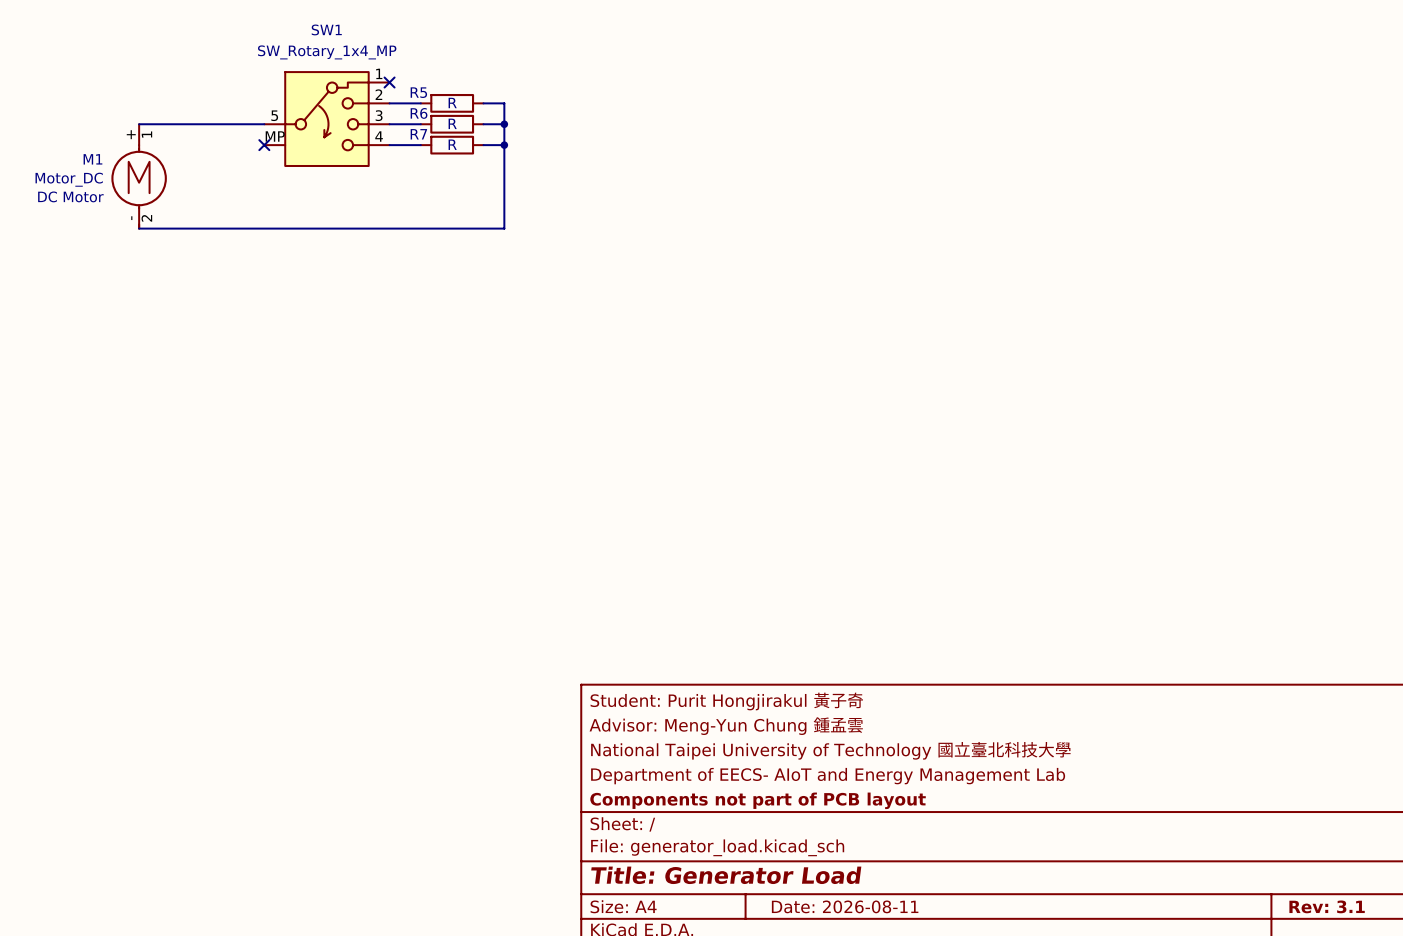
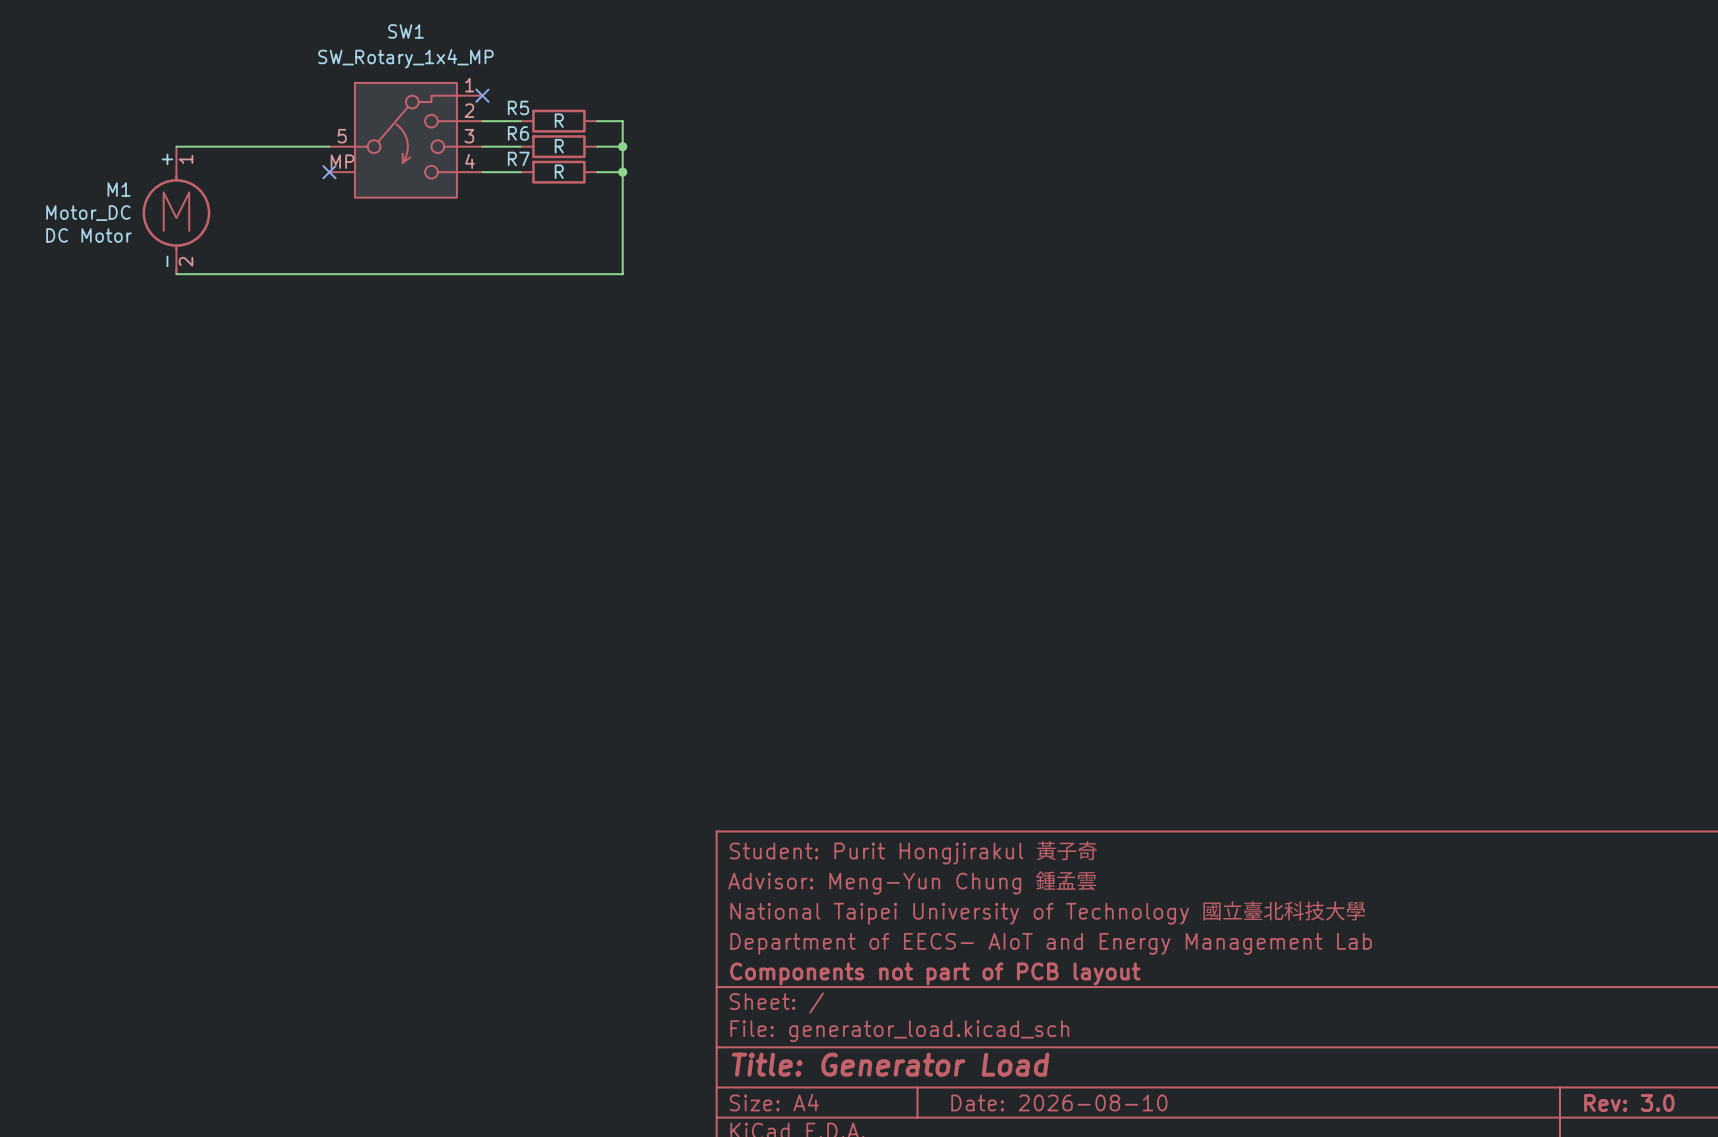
title block: Date: 2026-08-11 (845, 906) -> Date: 2026-08-10 (1059, 1102)
title block: Rev: 3.1 (1327, 906) -> Rev: 3.0 (1629, 1102)

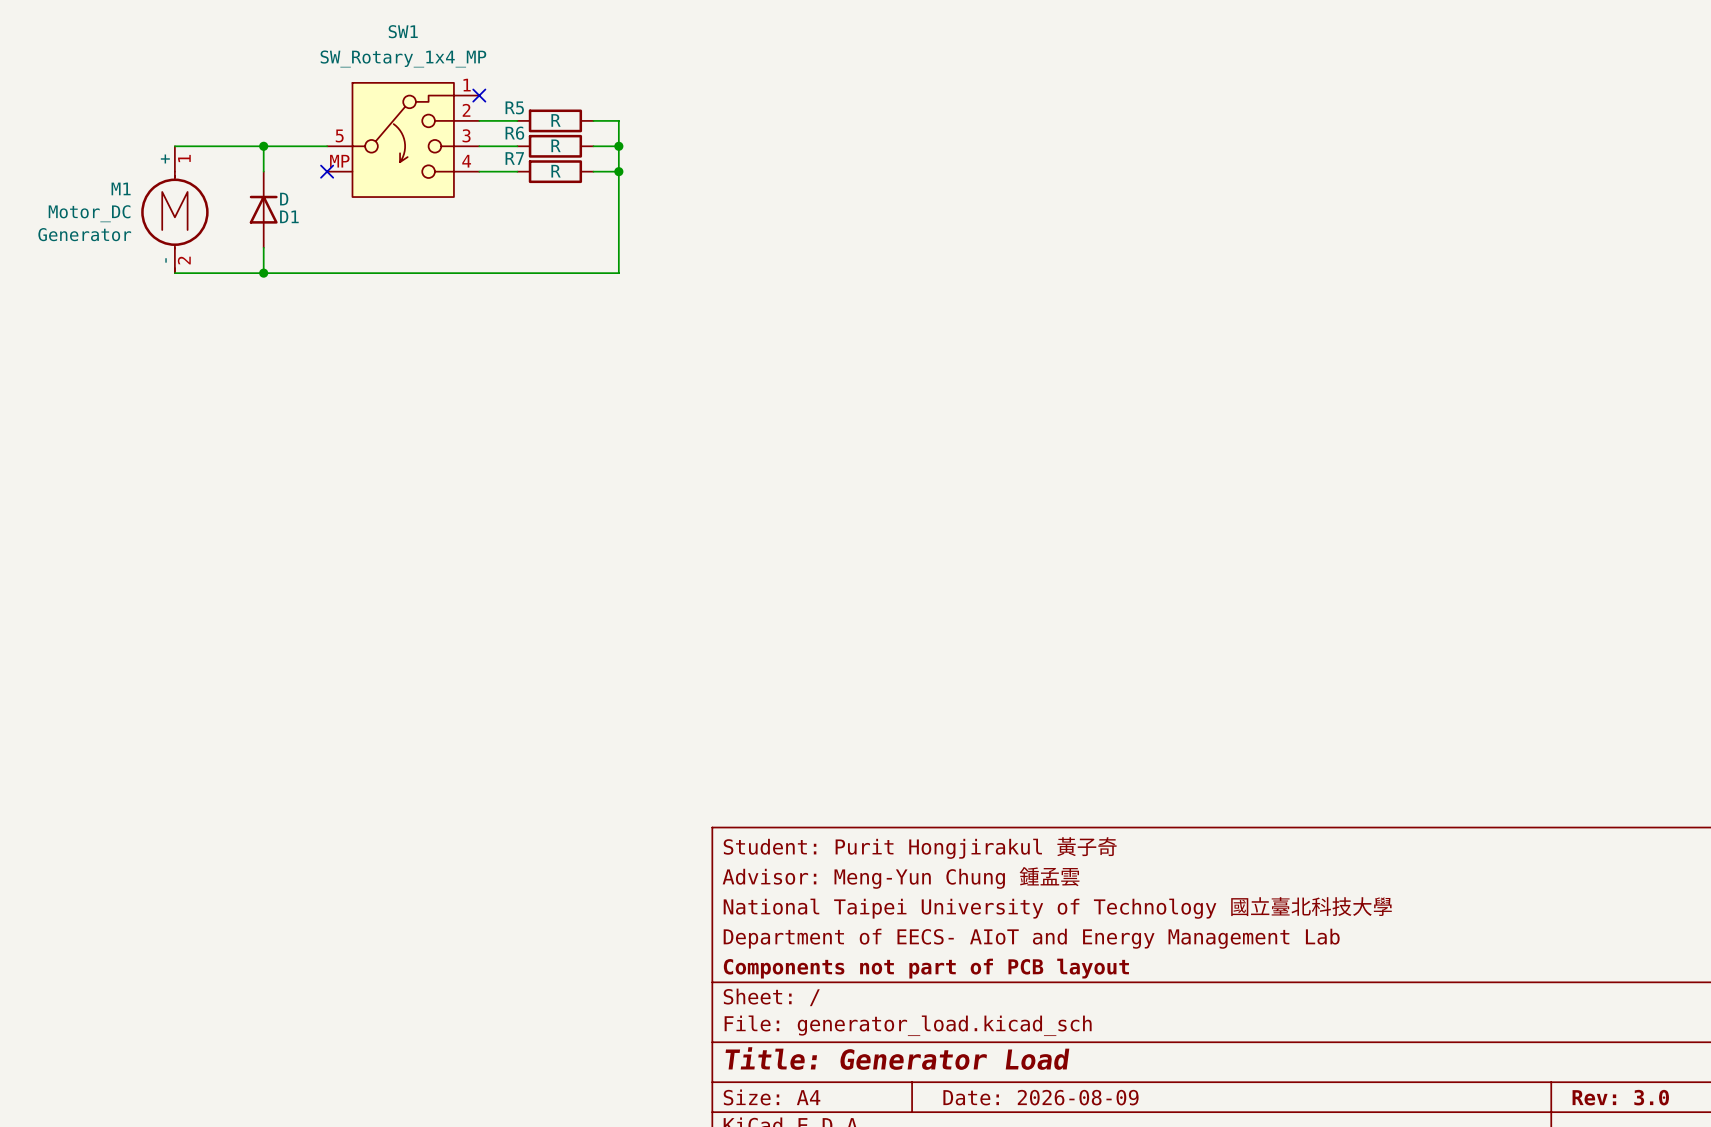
wire: none -> (263, 146) (263, 171)
junction: none -> (263, 146)
D1: none -> D (263, 209)
M1 text: DC Motor (88, 235) -> Generator (84, 234)
wire: none -> (263, 247) (263, 273)
junction: none -> (263, 273)
title block: Date: 2026-08-10 (1059, 1102) -> Date: 2026-08-09 (1040, 1097)

